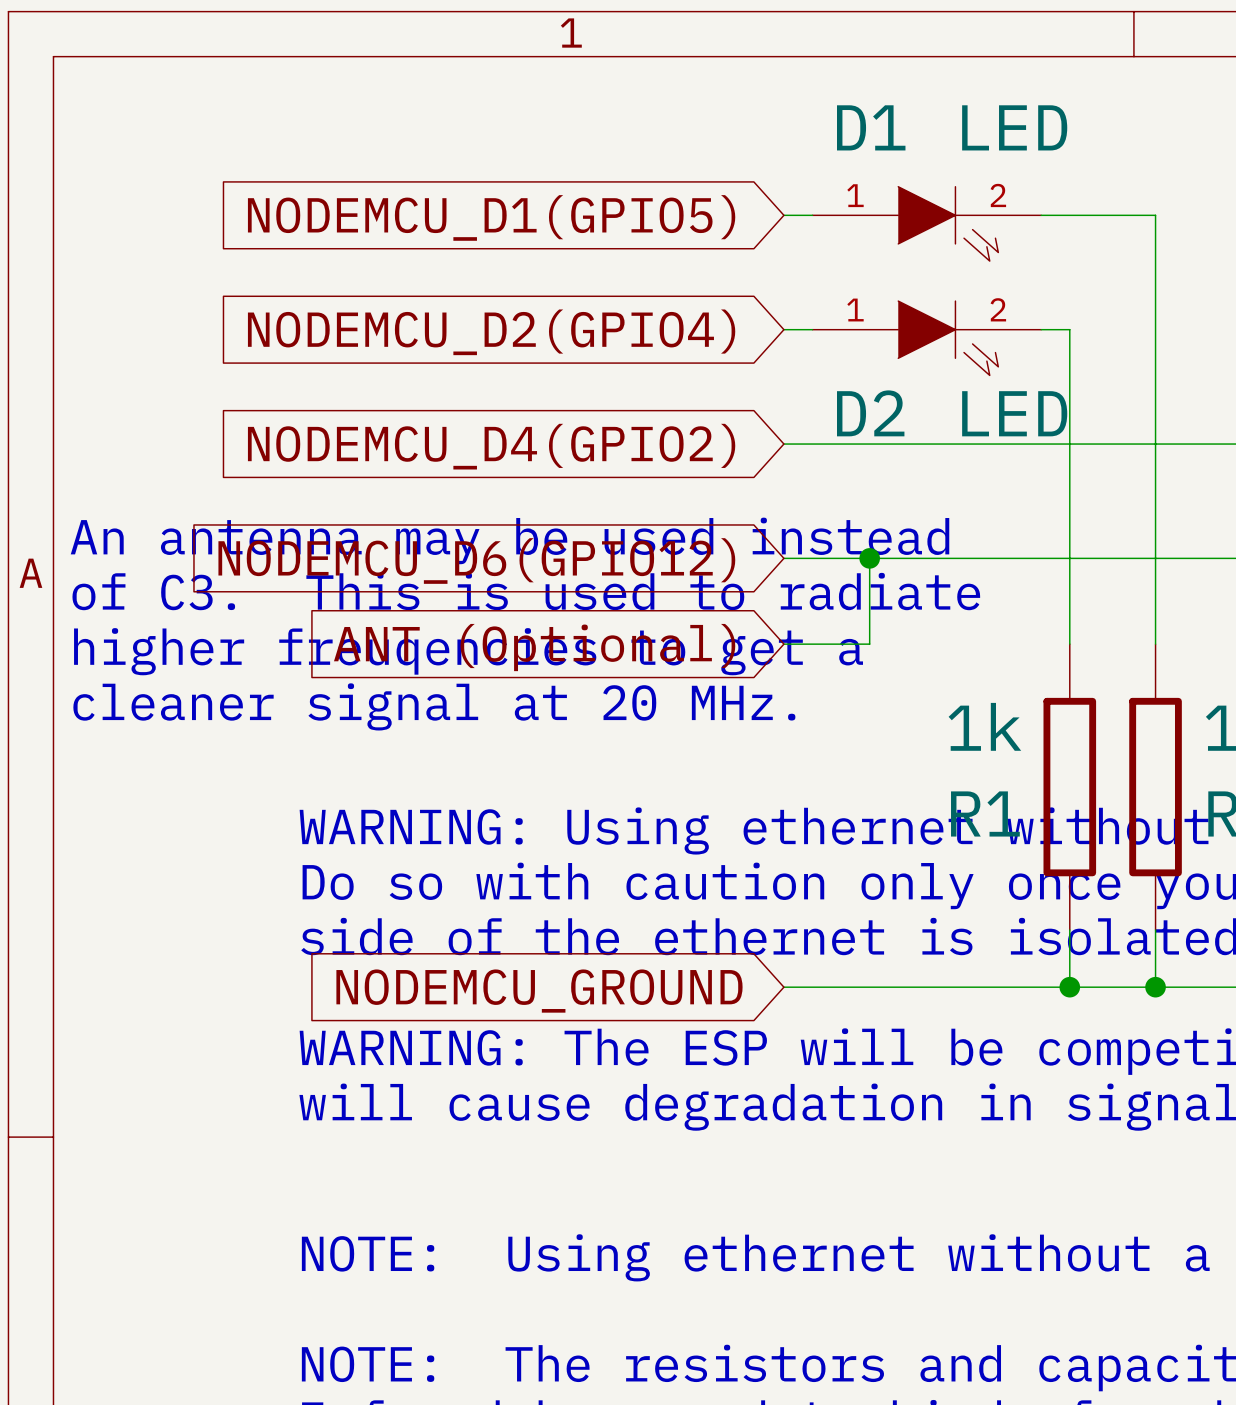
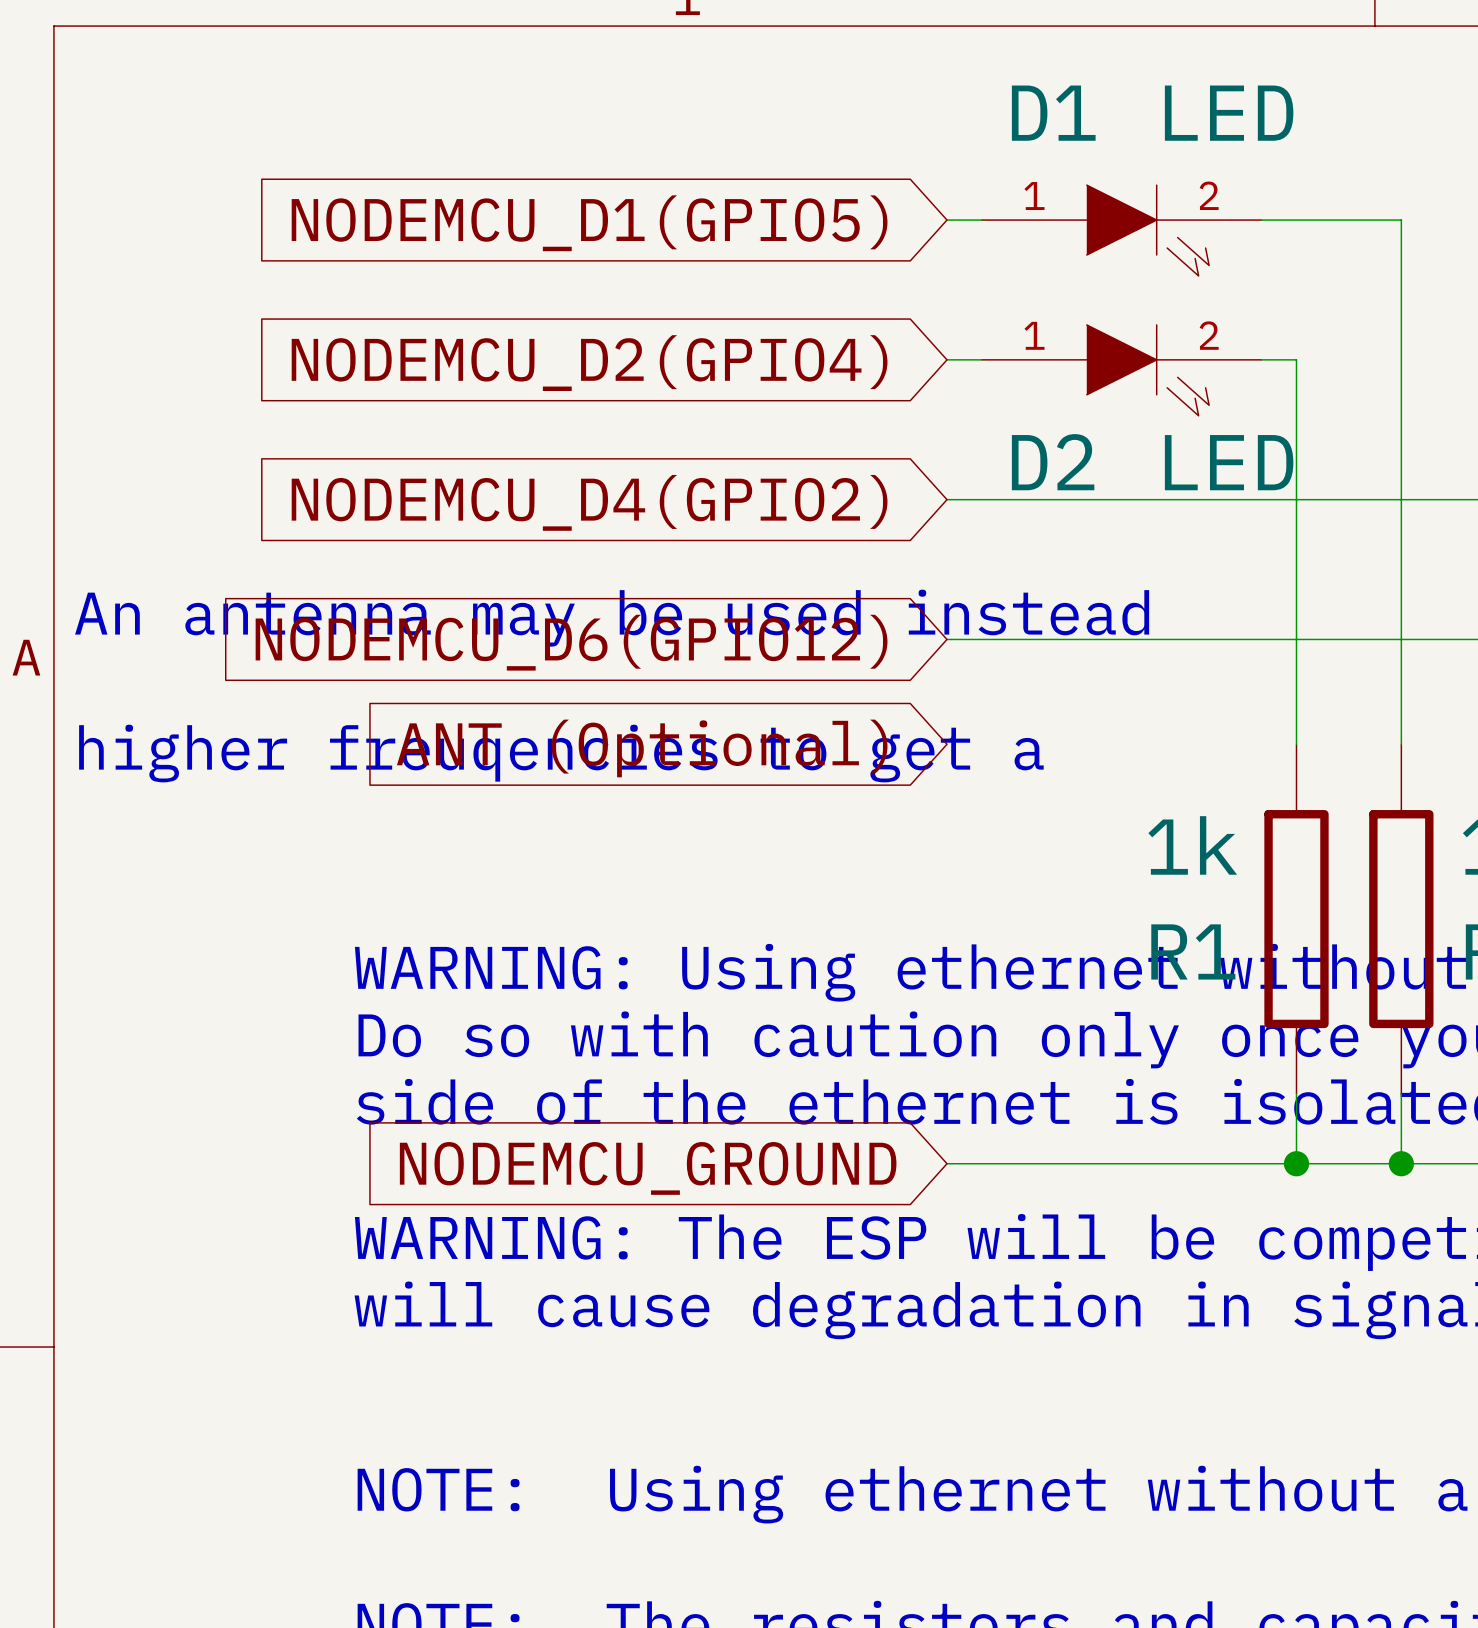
wire: (869, 558) (869, 644) (783, 644) -> none
junction: (869, 558) -> none
text: of C3. This is used to radiate (526, 591) -> none
text: cleaner signal at 20 MHz. (434, 706) -> none

